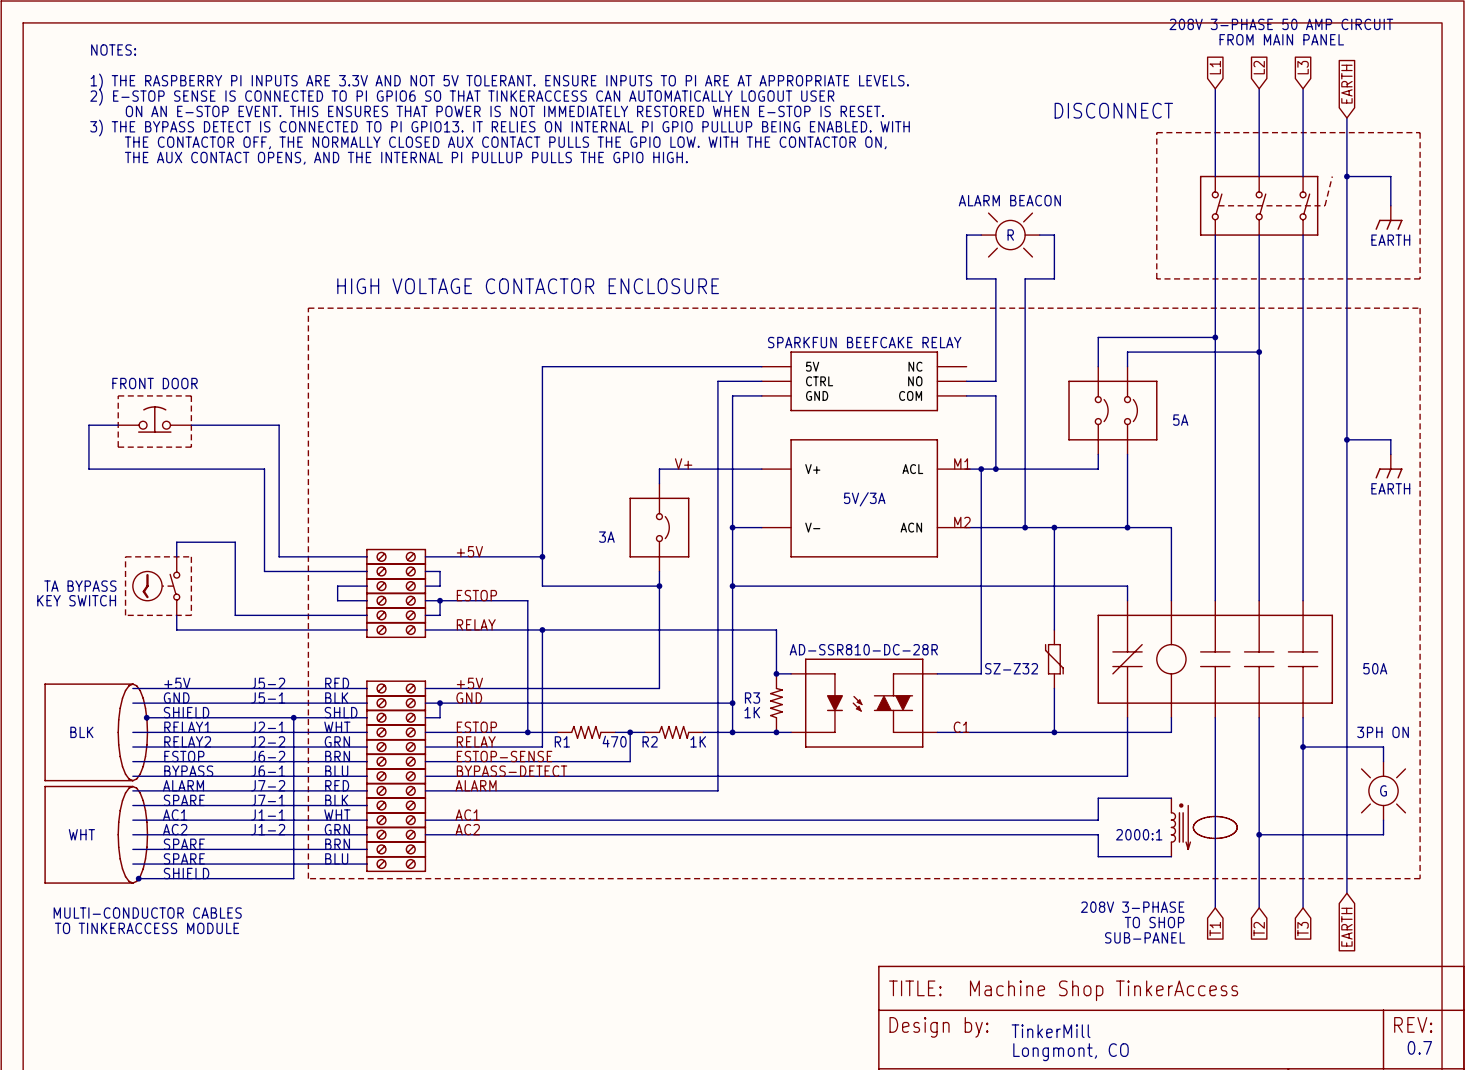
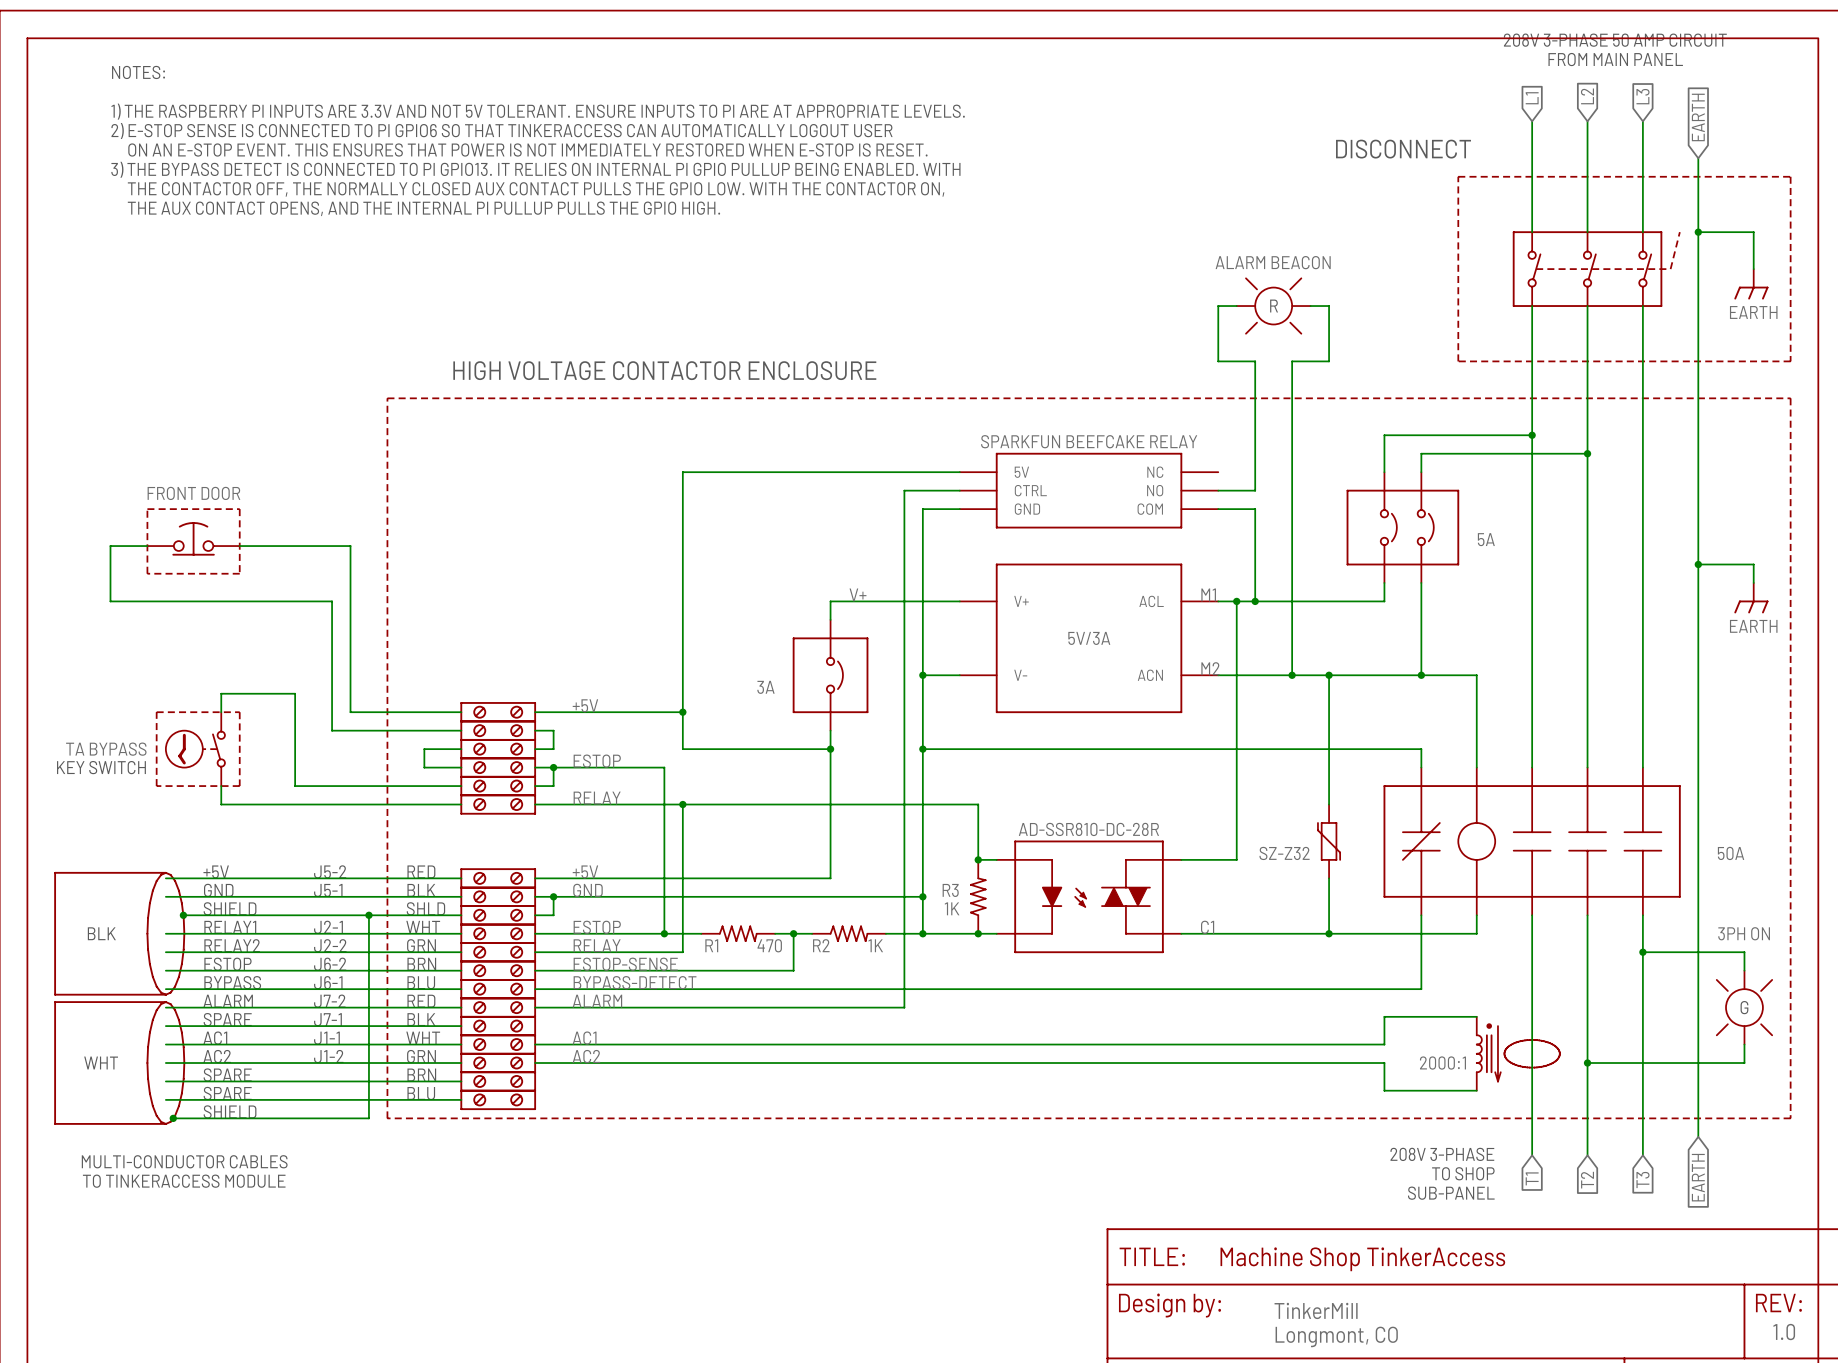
text: 0.7 (1419, 1047) -> 1.0 (1784, 1332)

